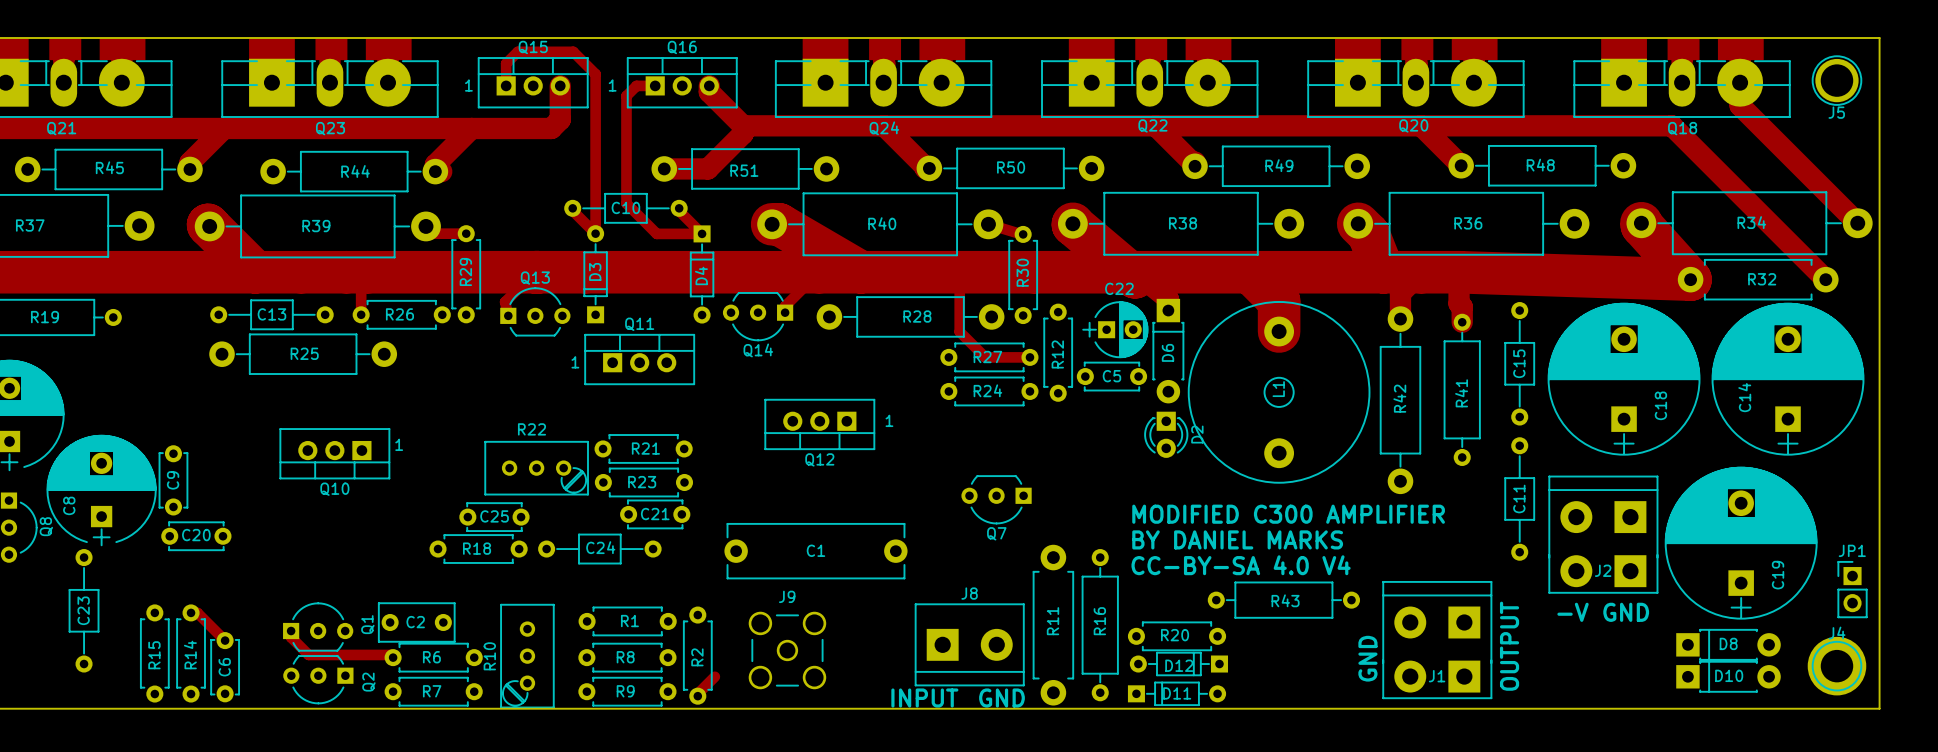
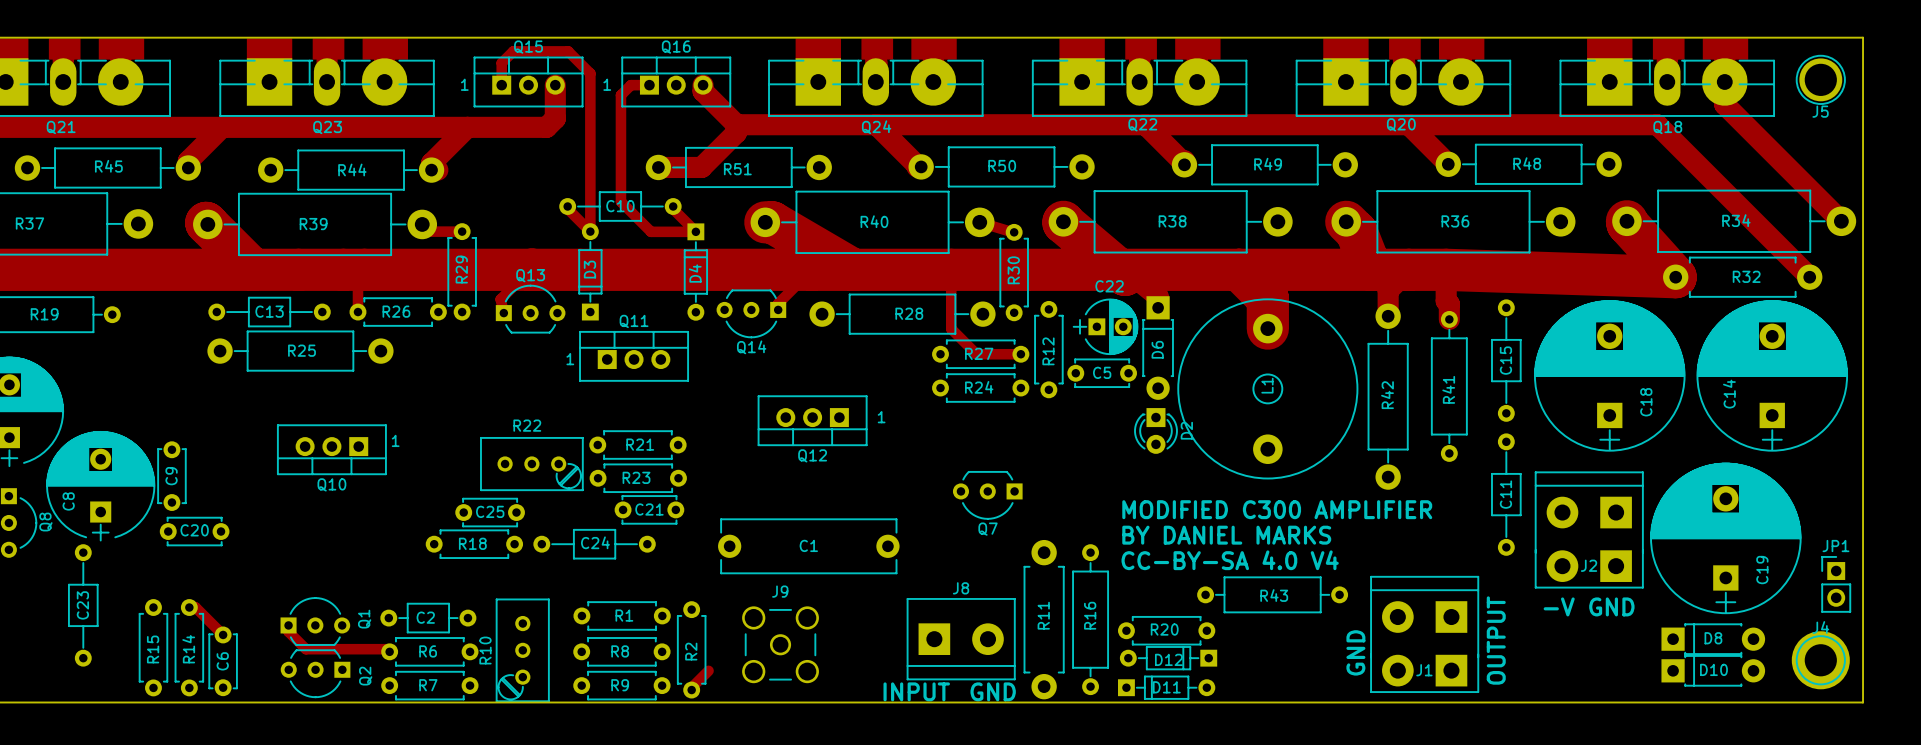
C2 footprint: [378, 602, 456, 643] -> [380, 603, 477, 634]

